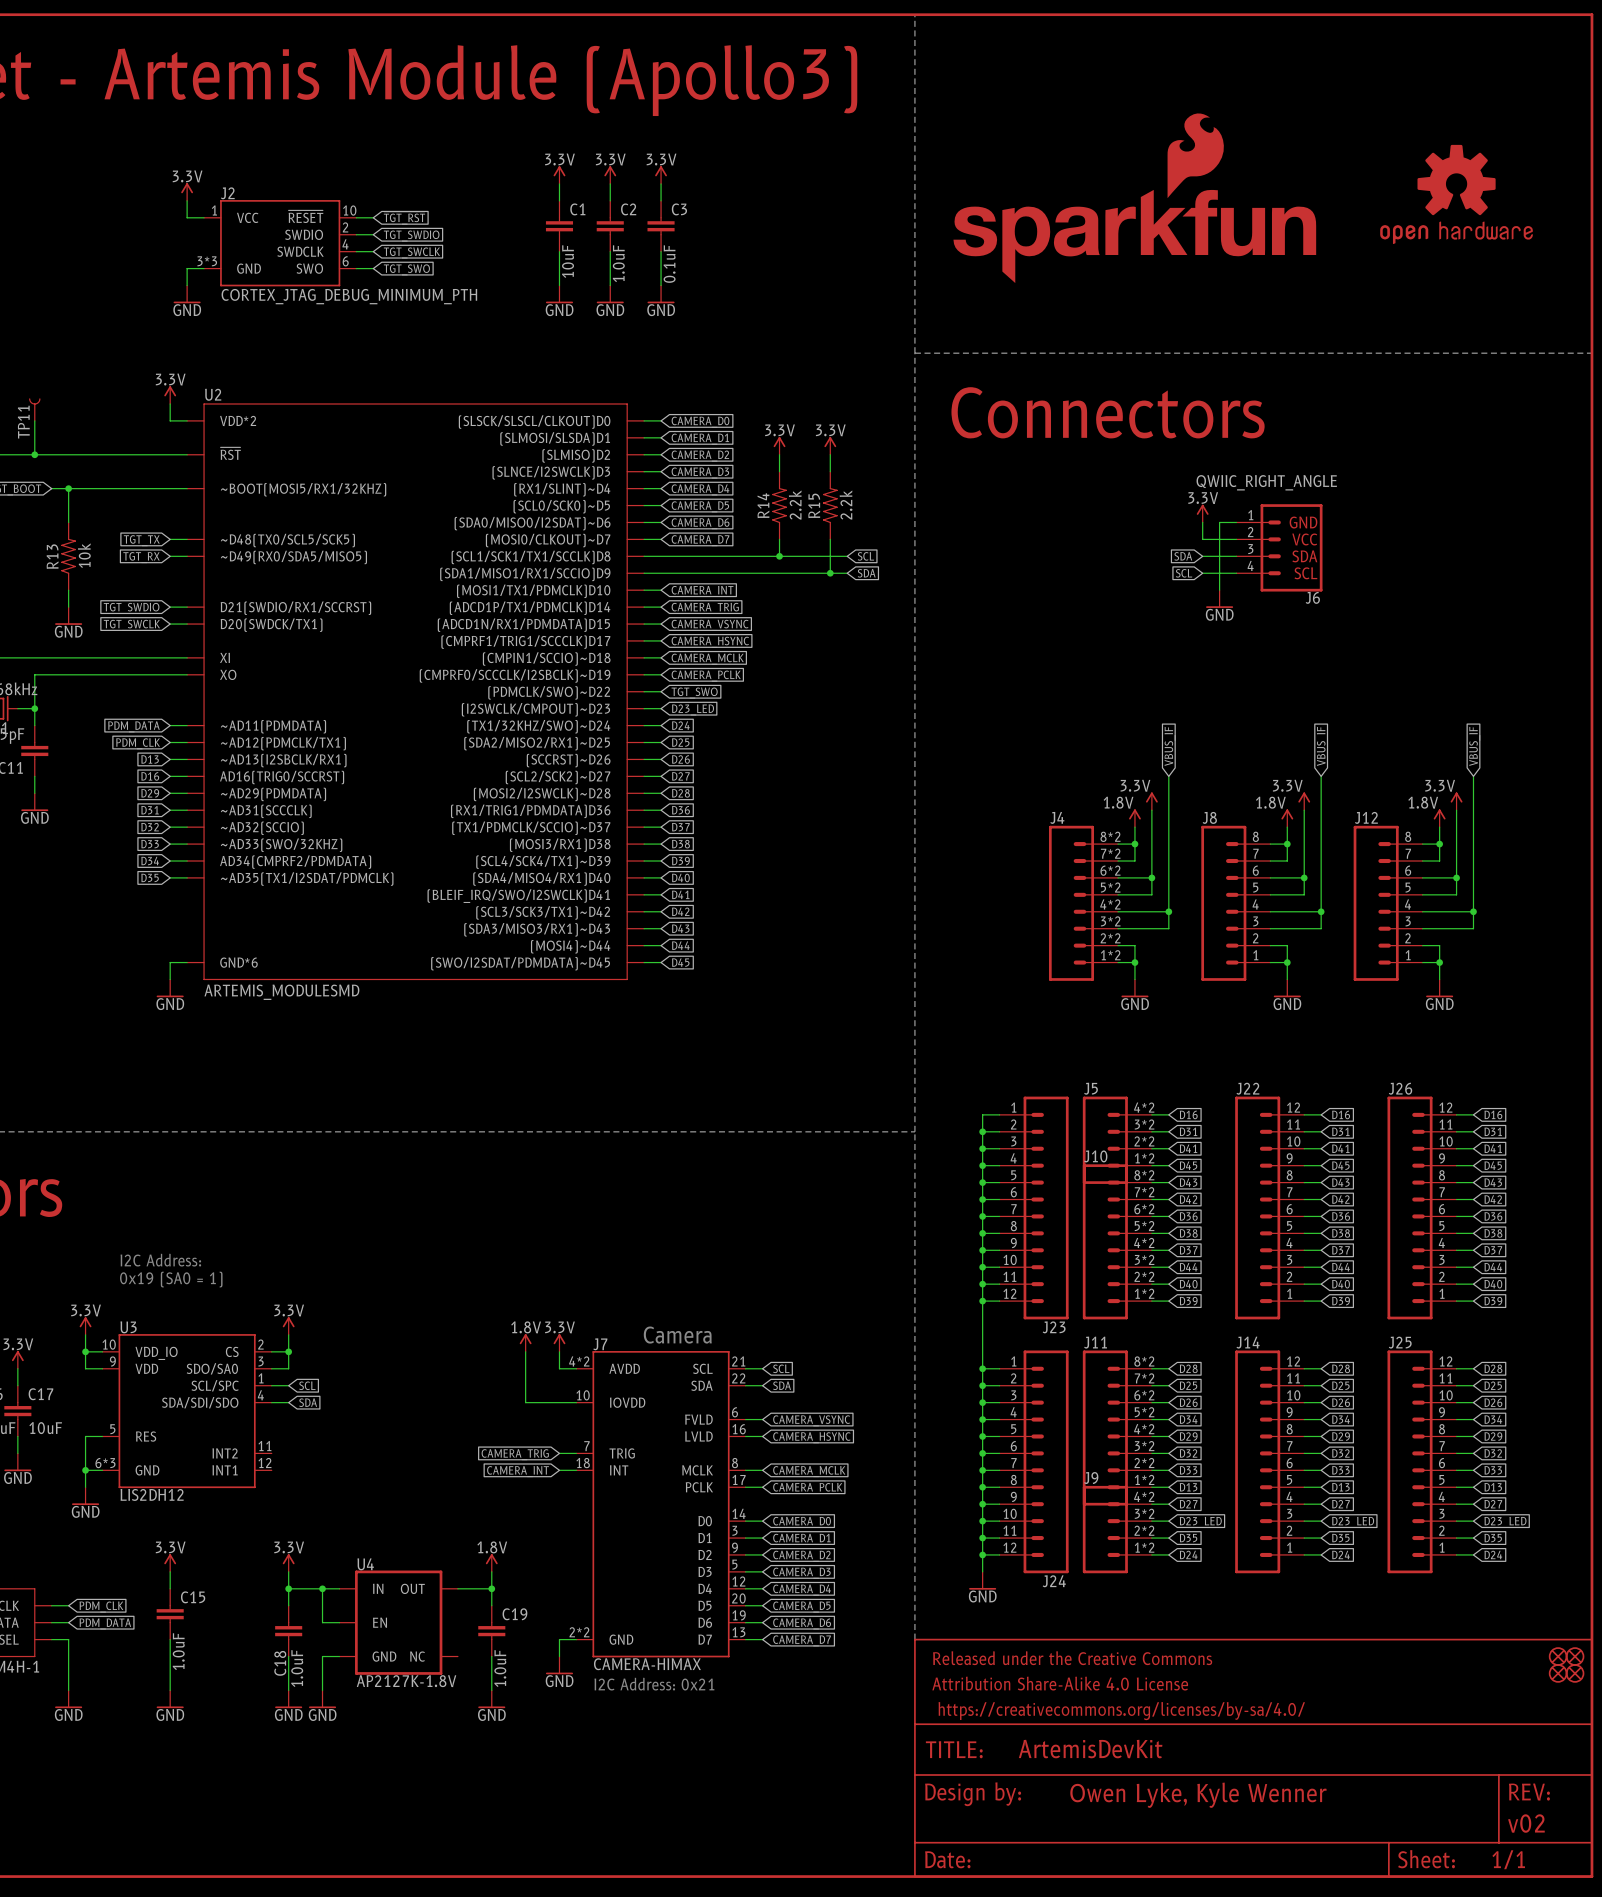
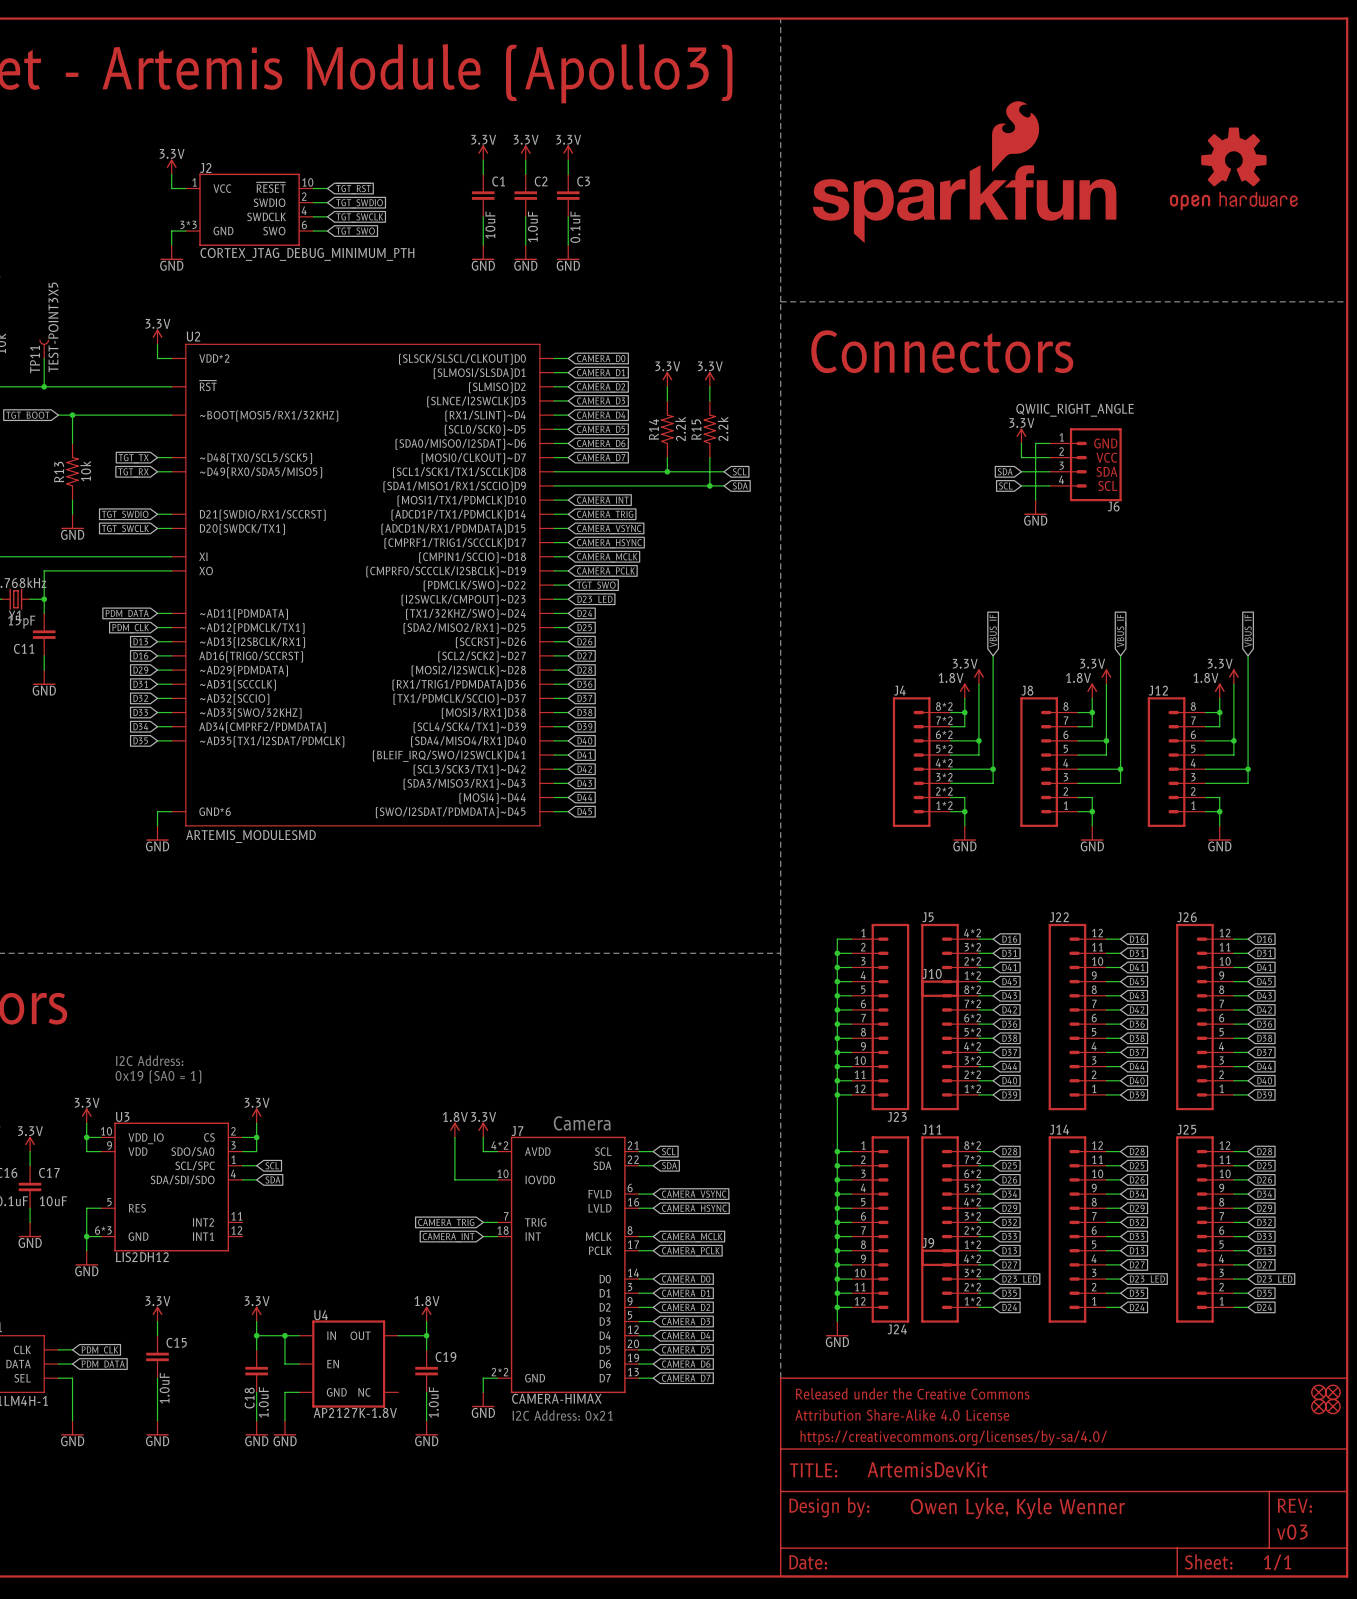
TP11 value: none -> TEST-POINT3X5 (53, 327)
part text: v02 (1526, 1823) -> v03 (1292, 1532)

